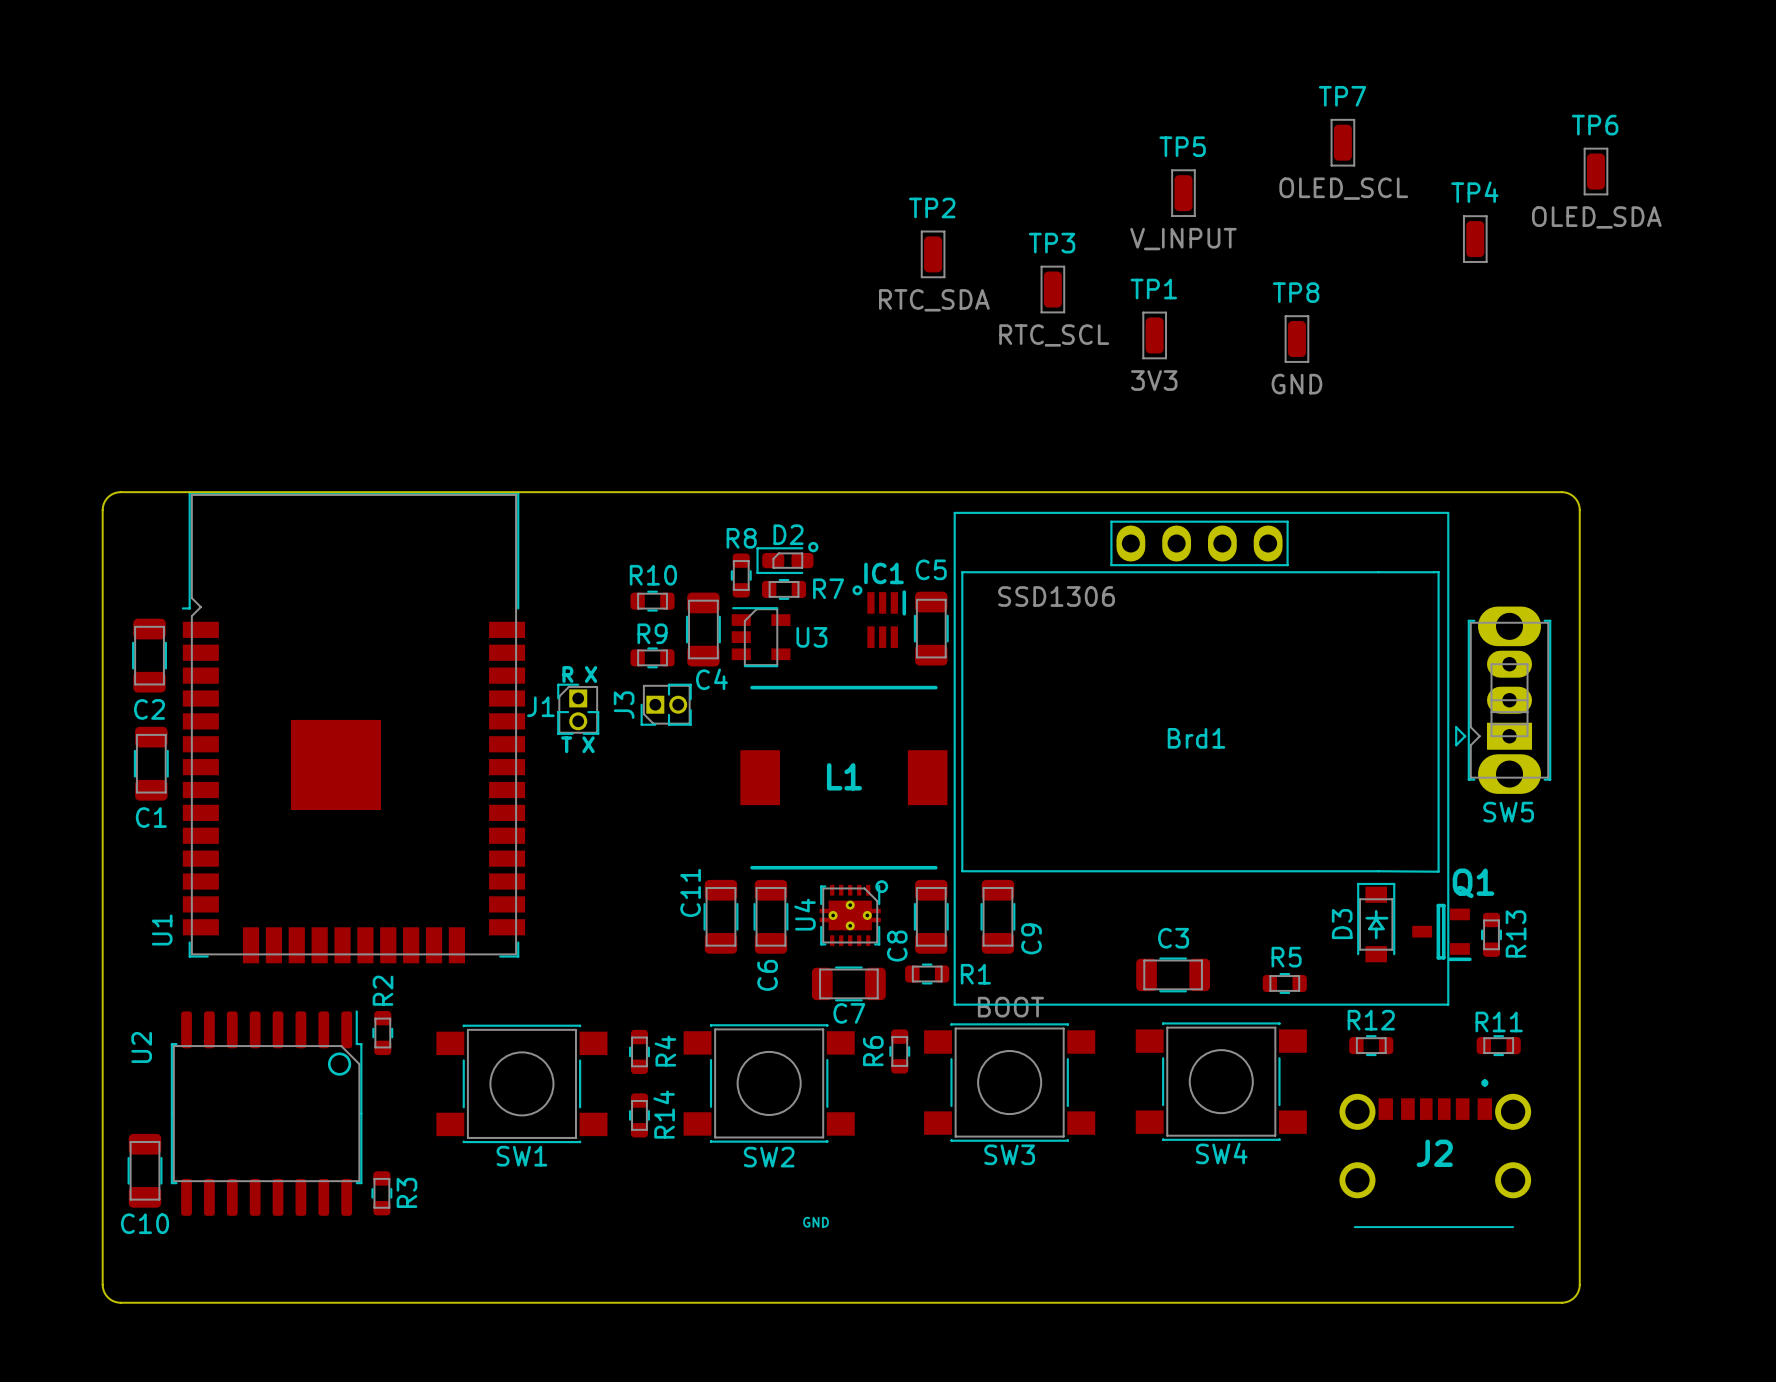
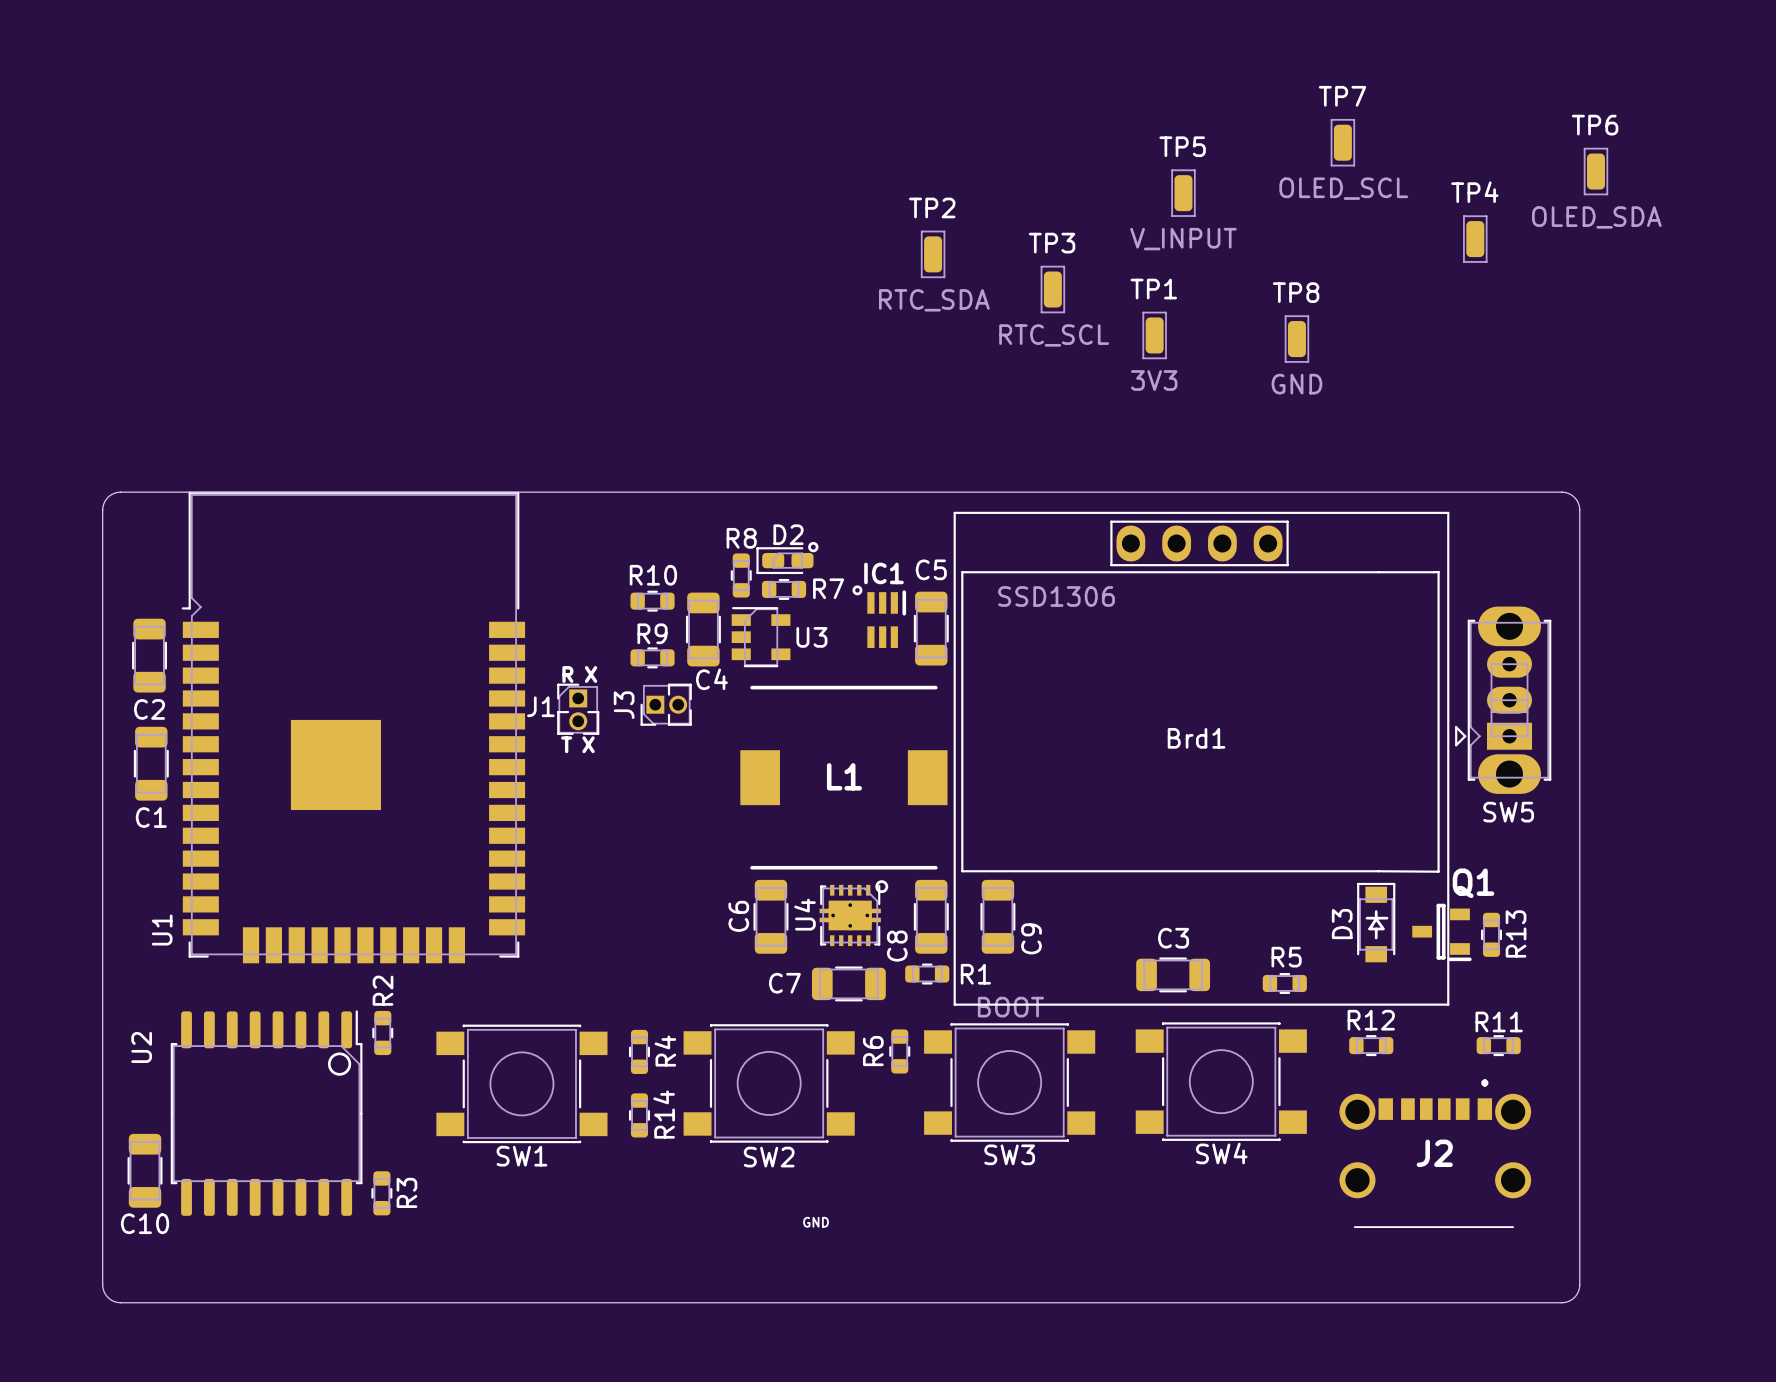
C11: (720, 916) -> none
C6 name position: C6 (767, 975) -> C6 (738, 916)
C7 name position: C7 (849, 1013) -> C7 (784, 983)

